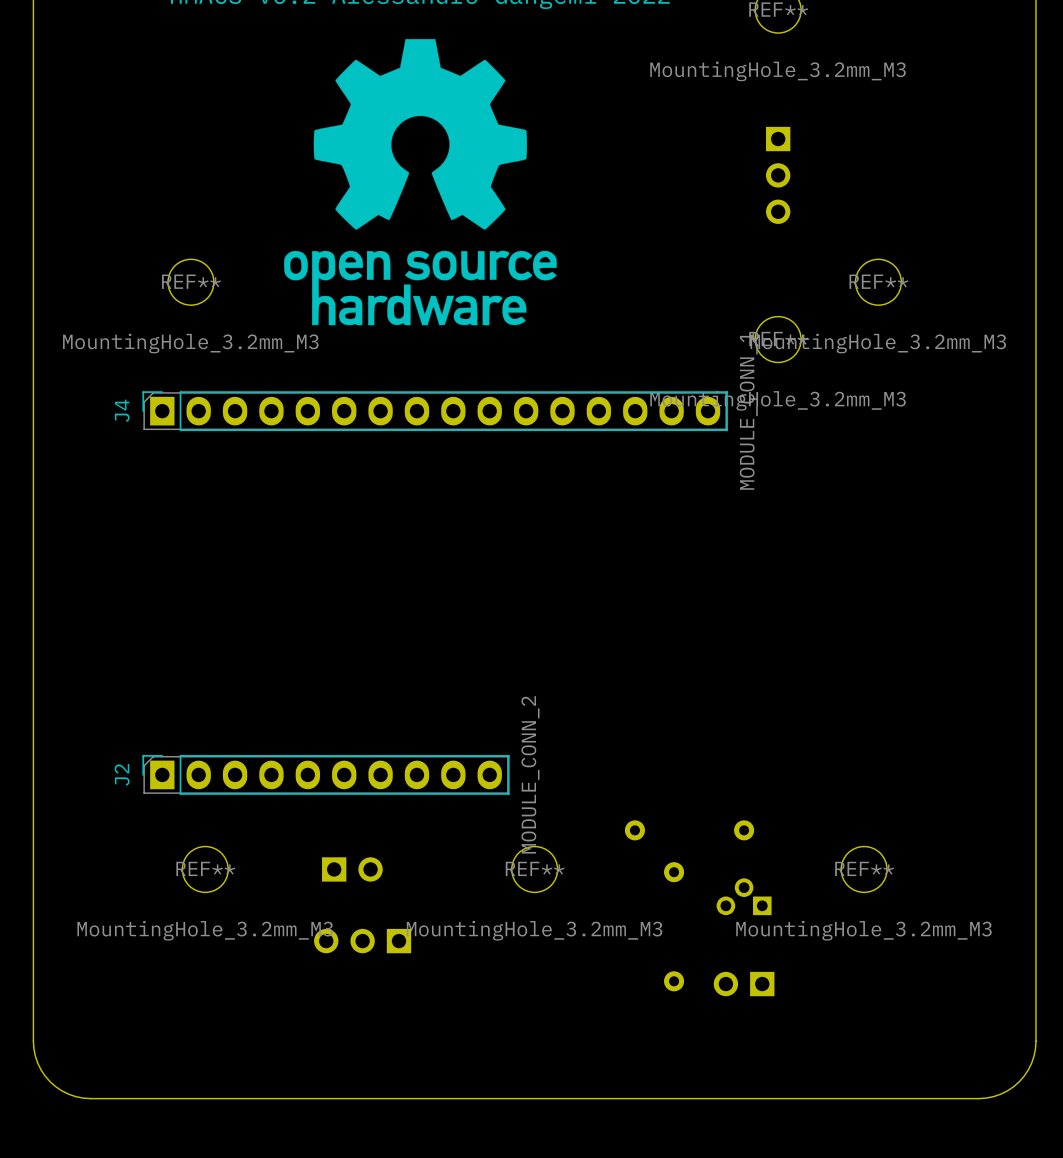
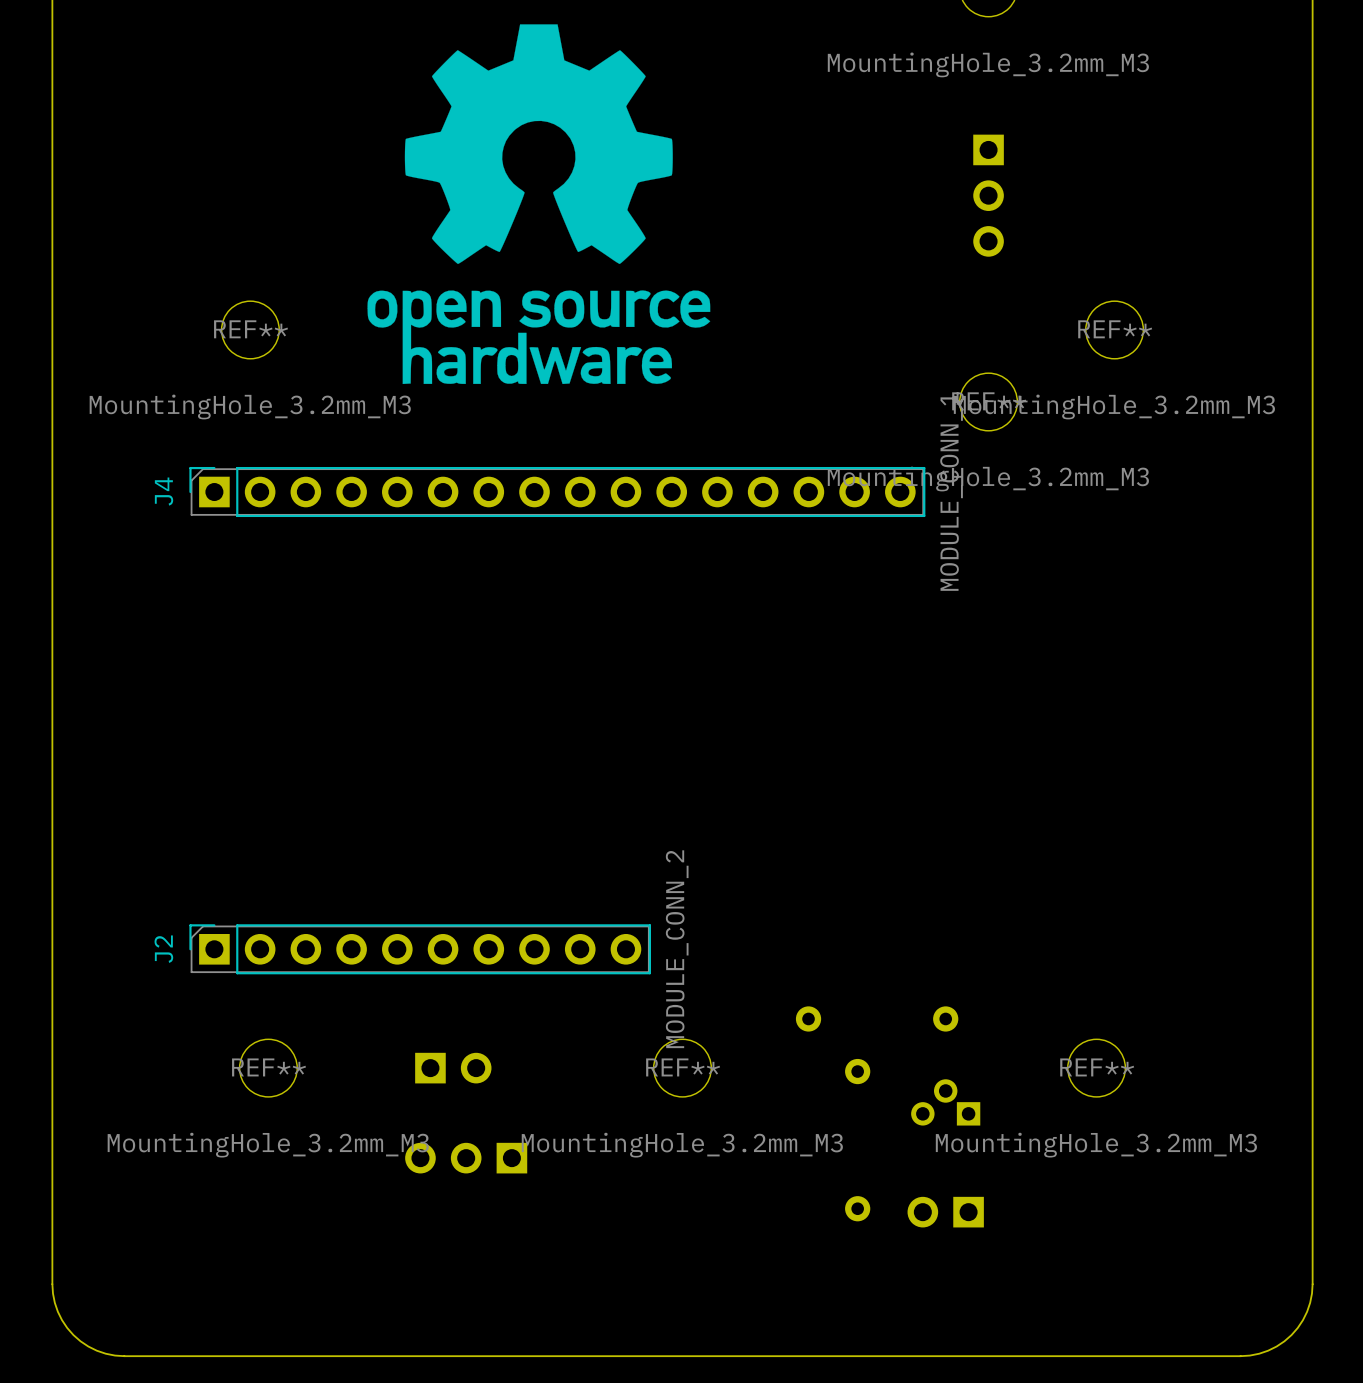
J4 footprint: [142, 391, 728, 432] -> [189, 466, 926, 518]
J2 footprint: [142, 755, 510, 795] -> [189, 924, 651, 975]

